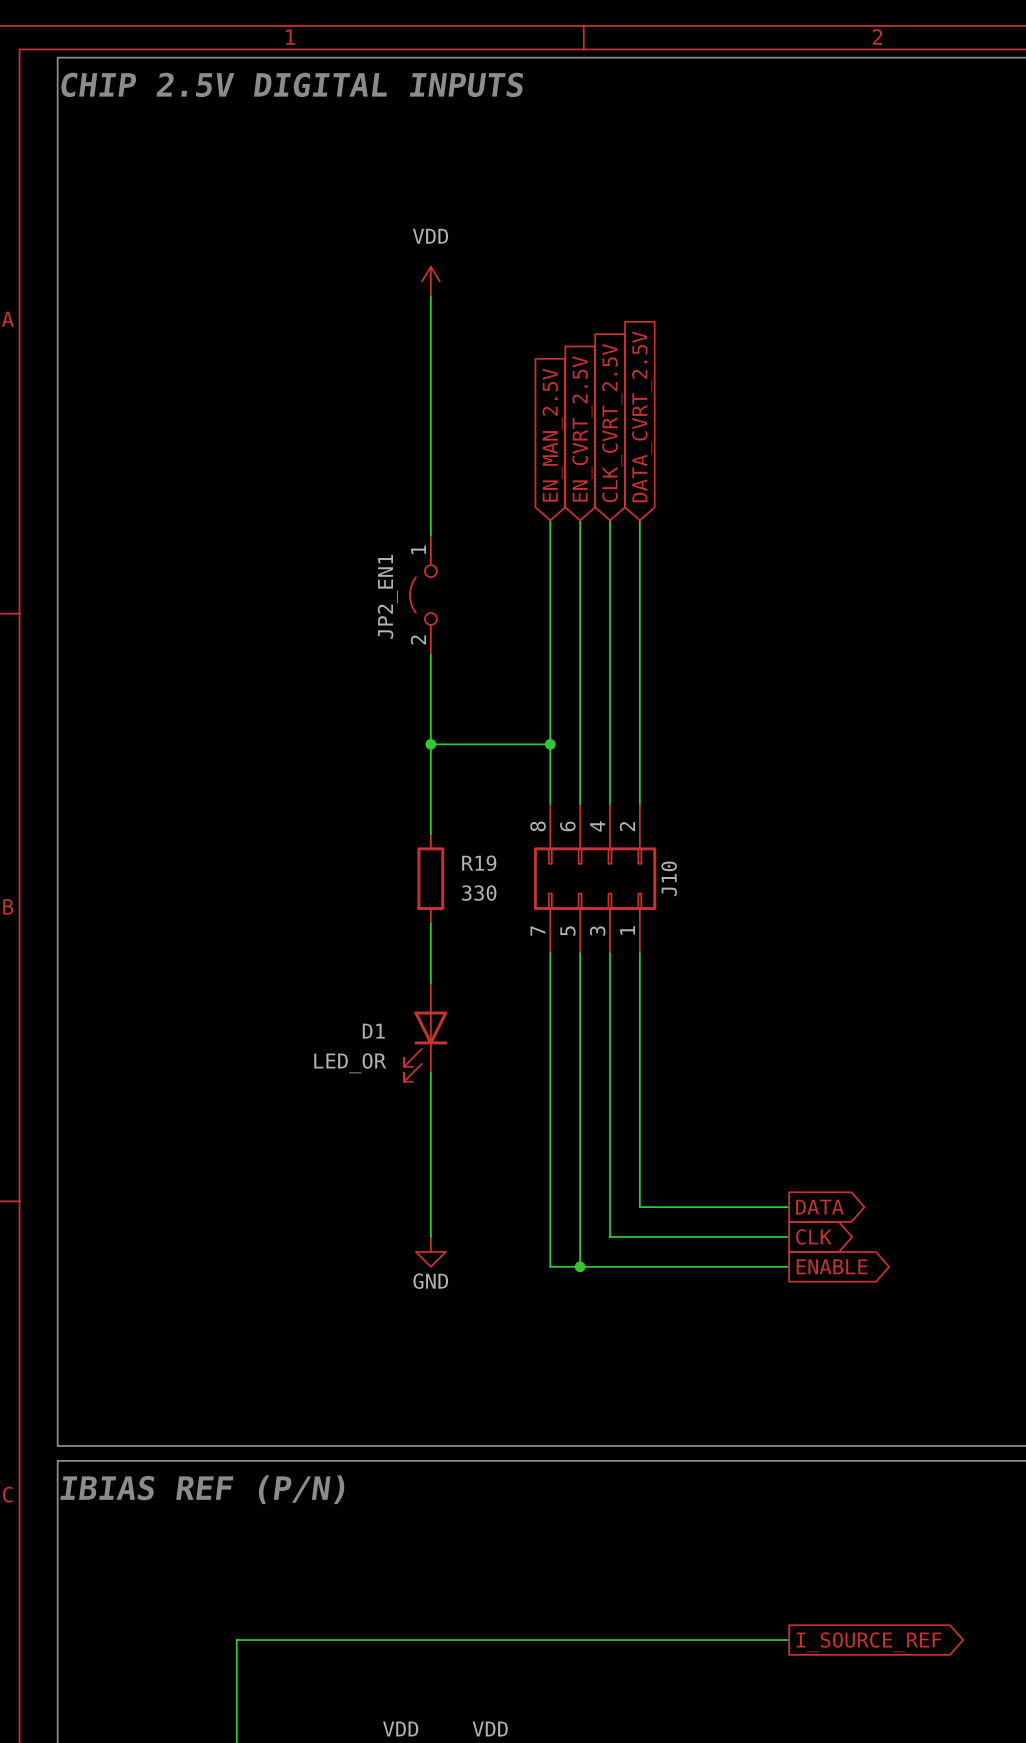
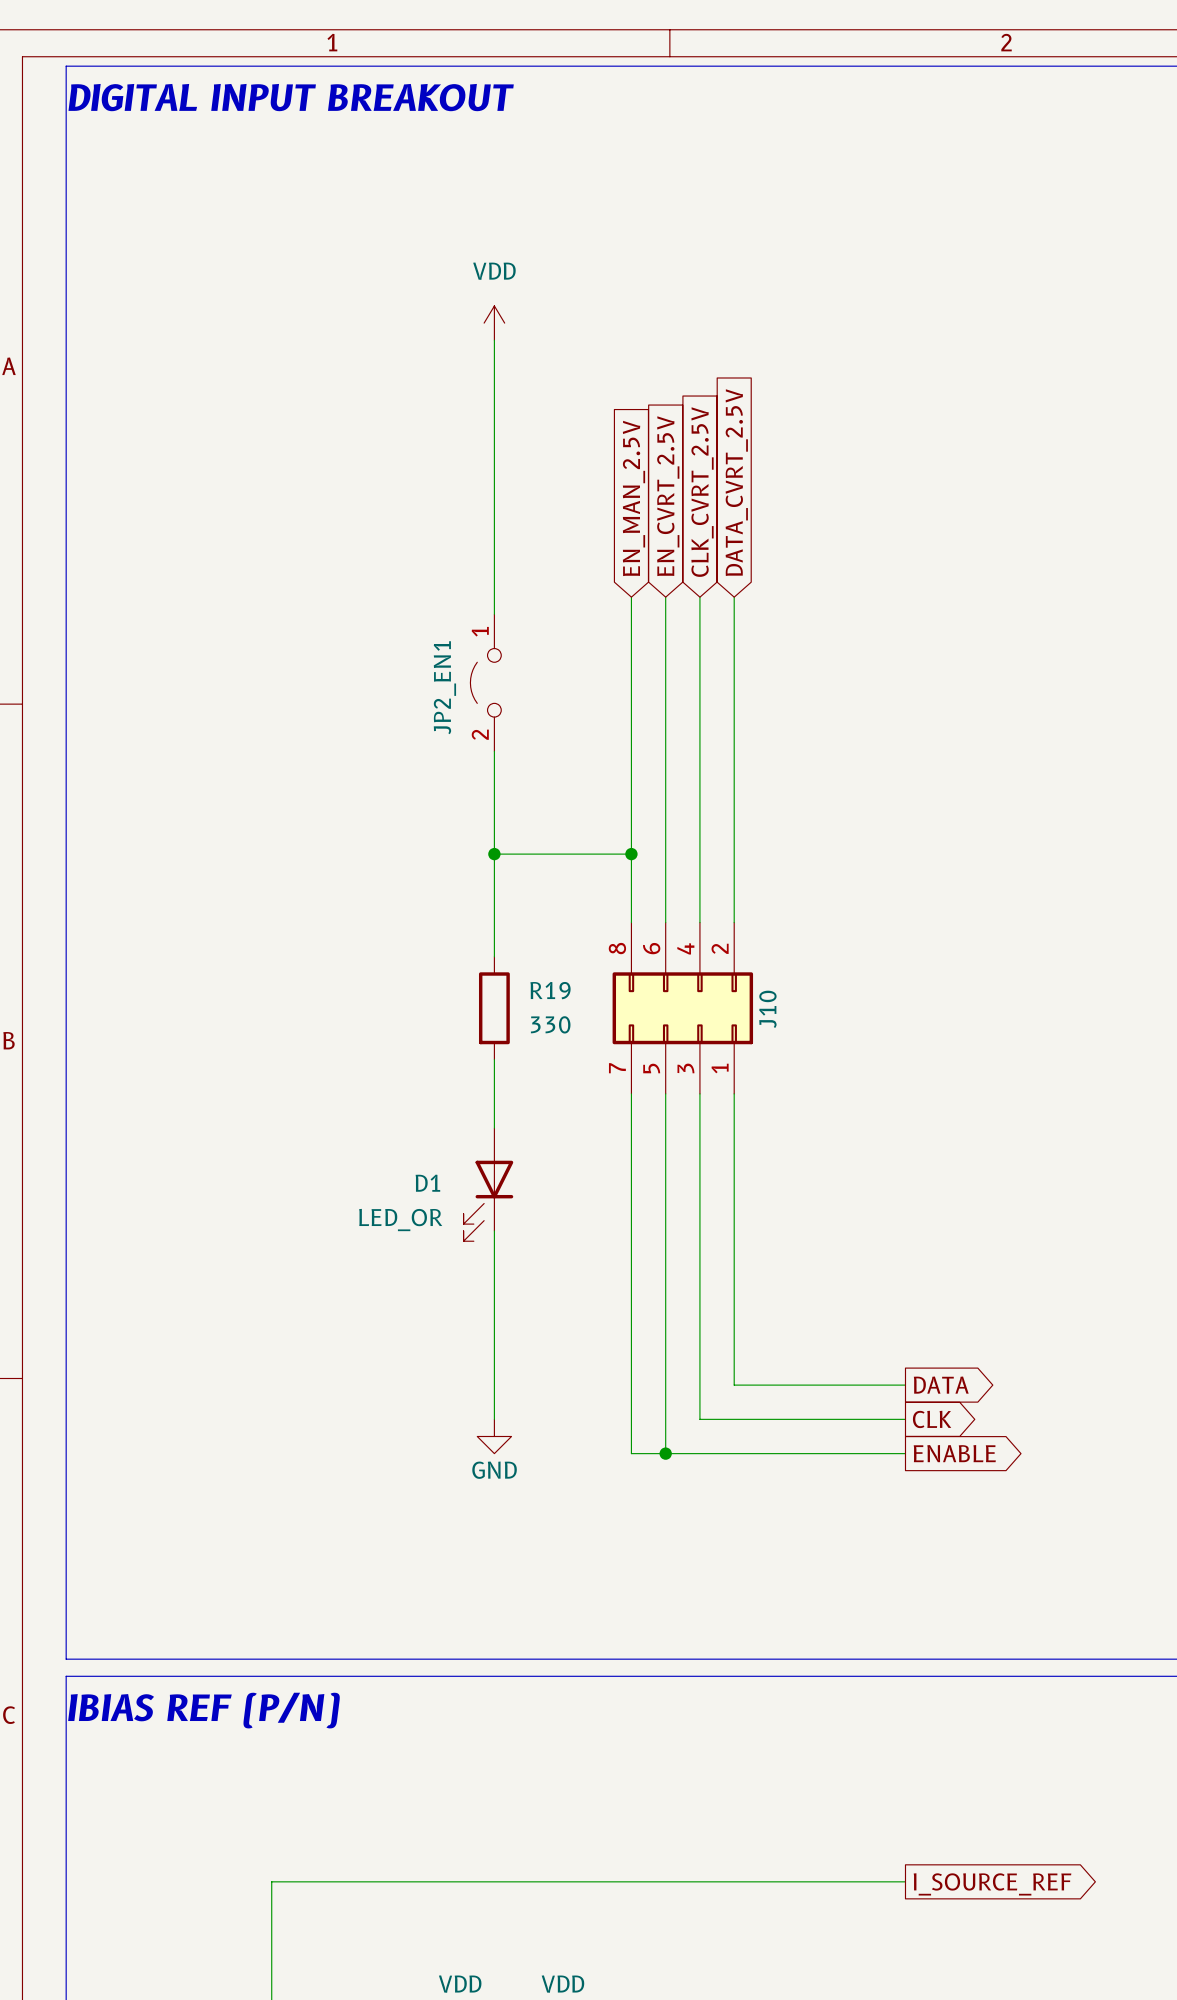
text: CHIP 2.5V DIGITAL INPUTS (291, 84) -> DIGITAL INPUT BREAKOUT (291, 97)

